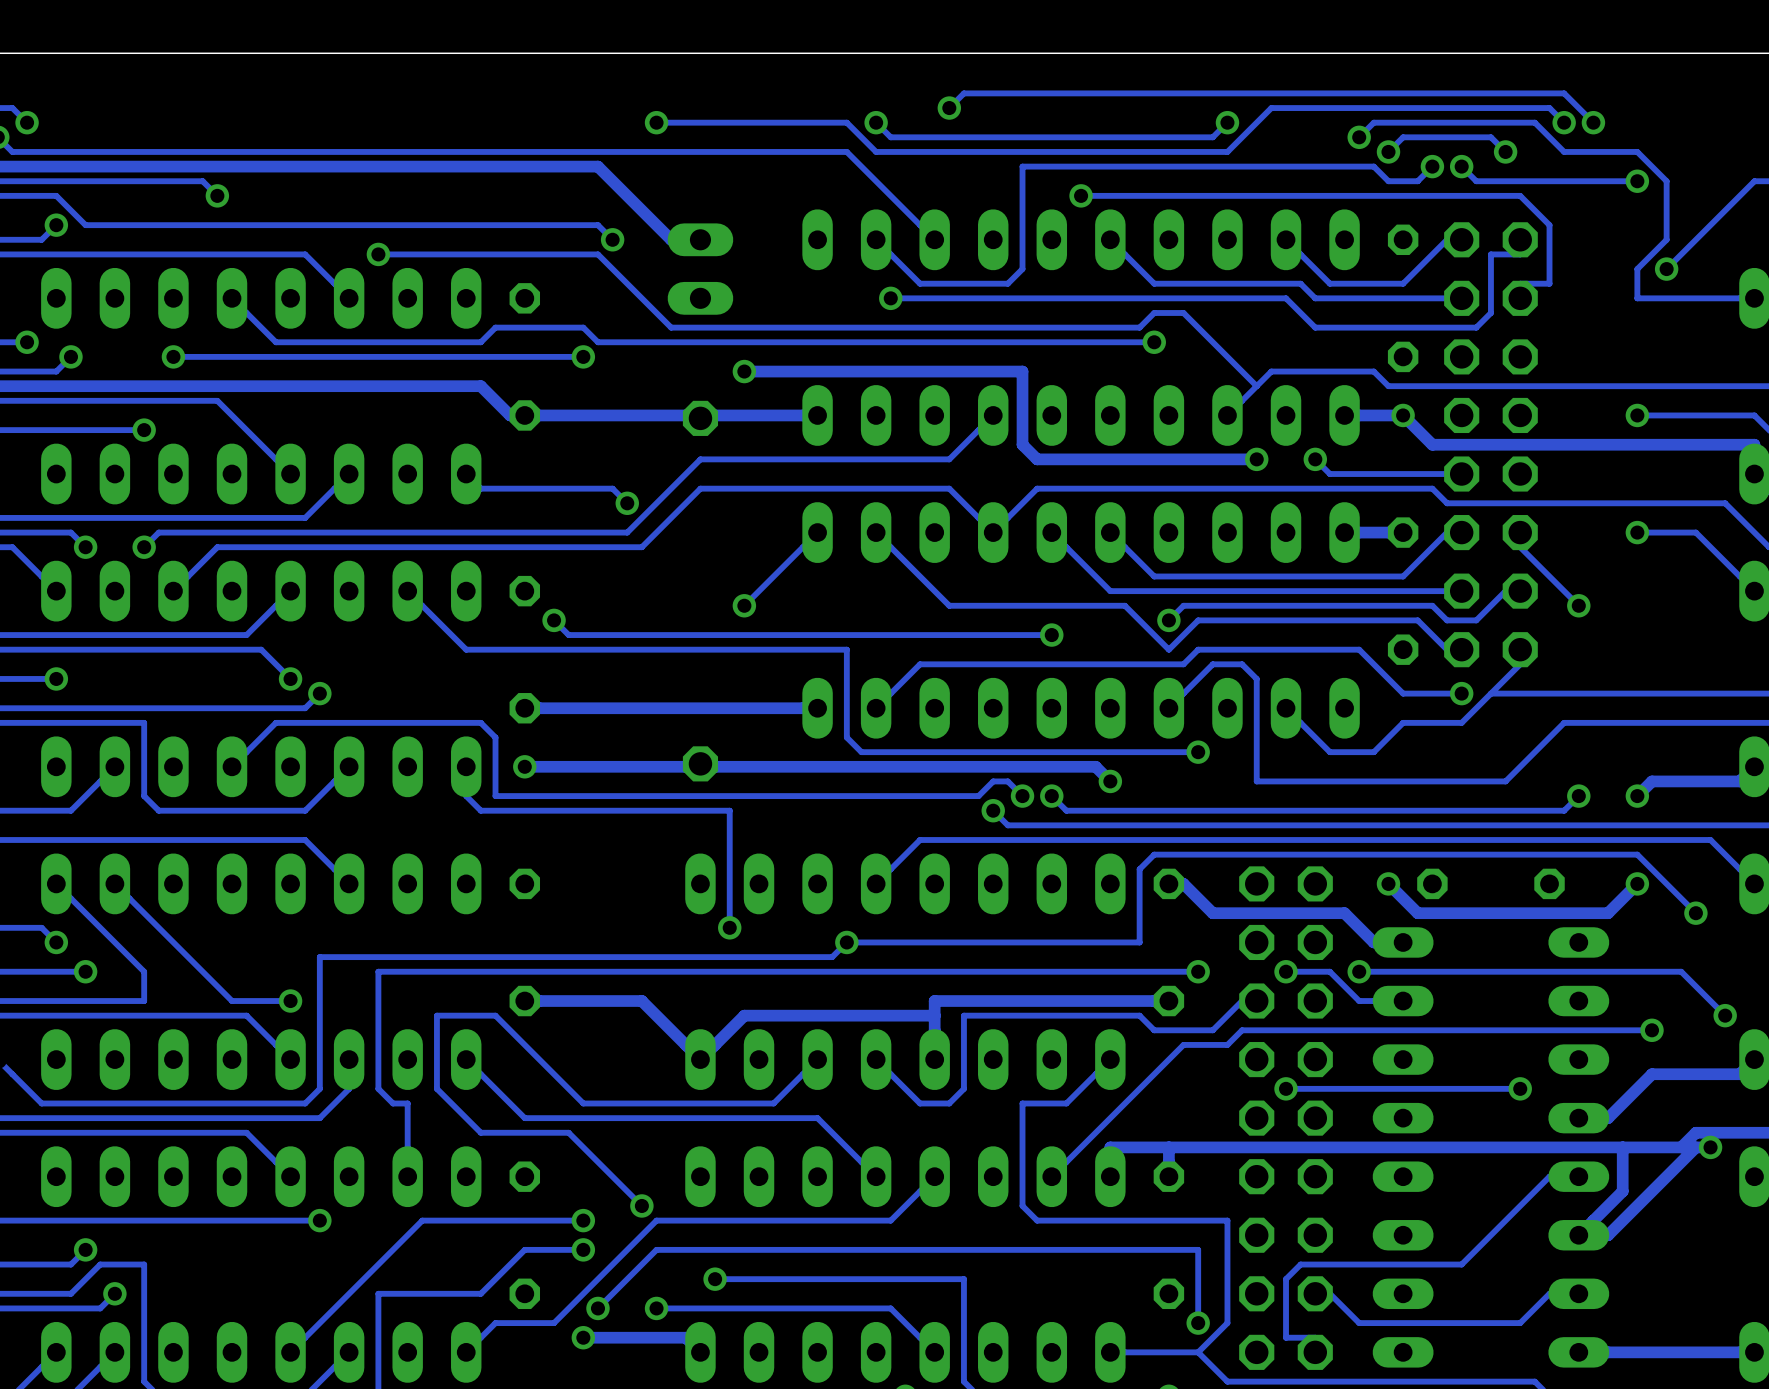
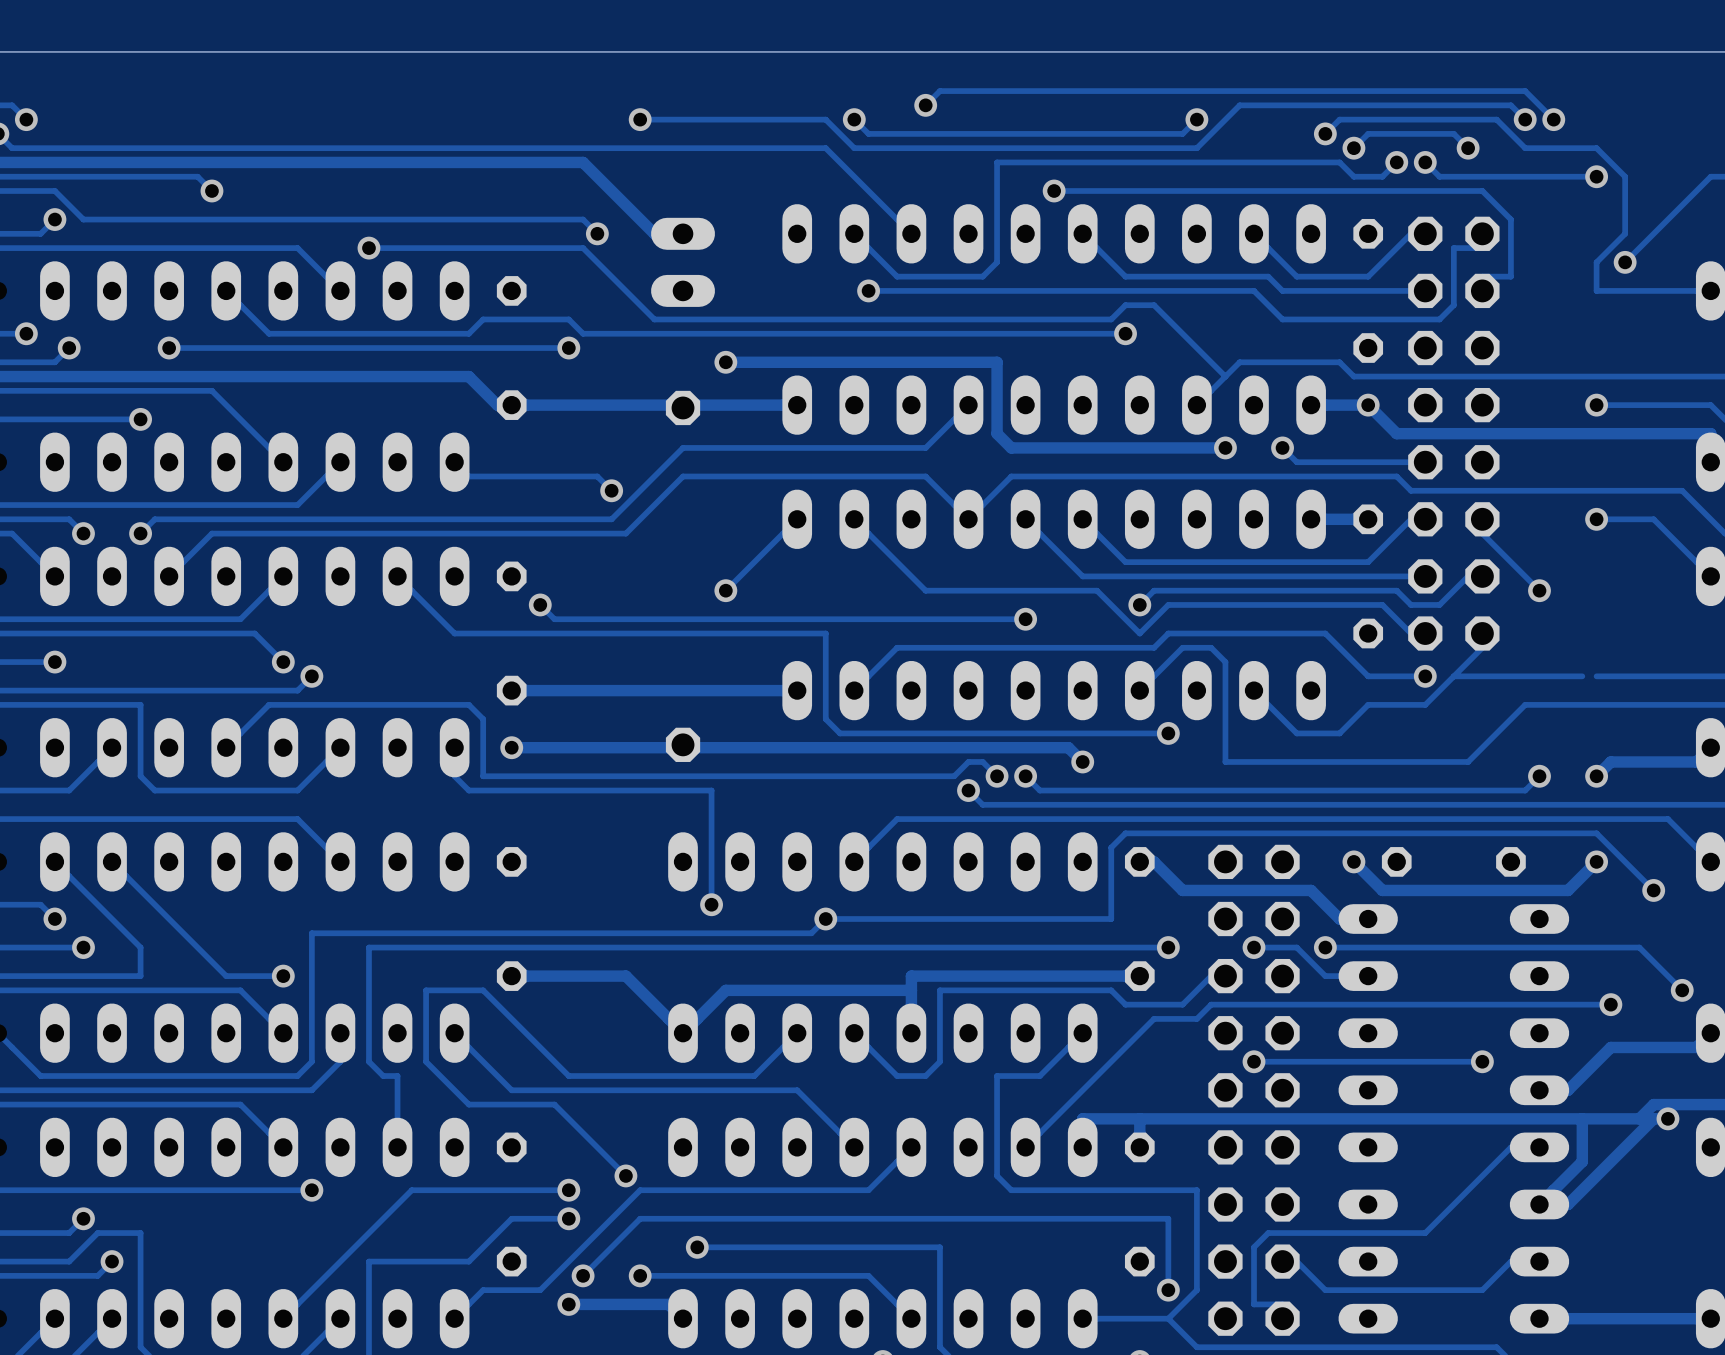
track: (1637, 693) (1622, 693) -> none

